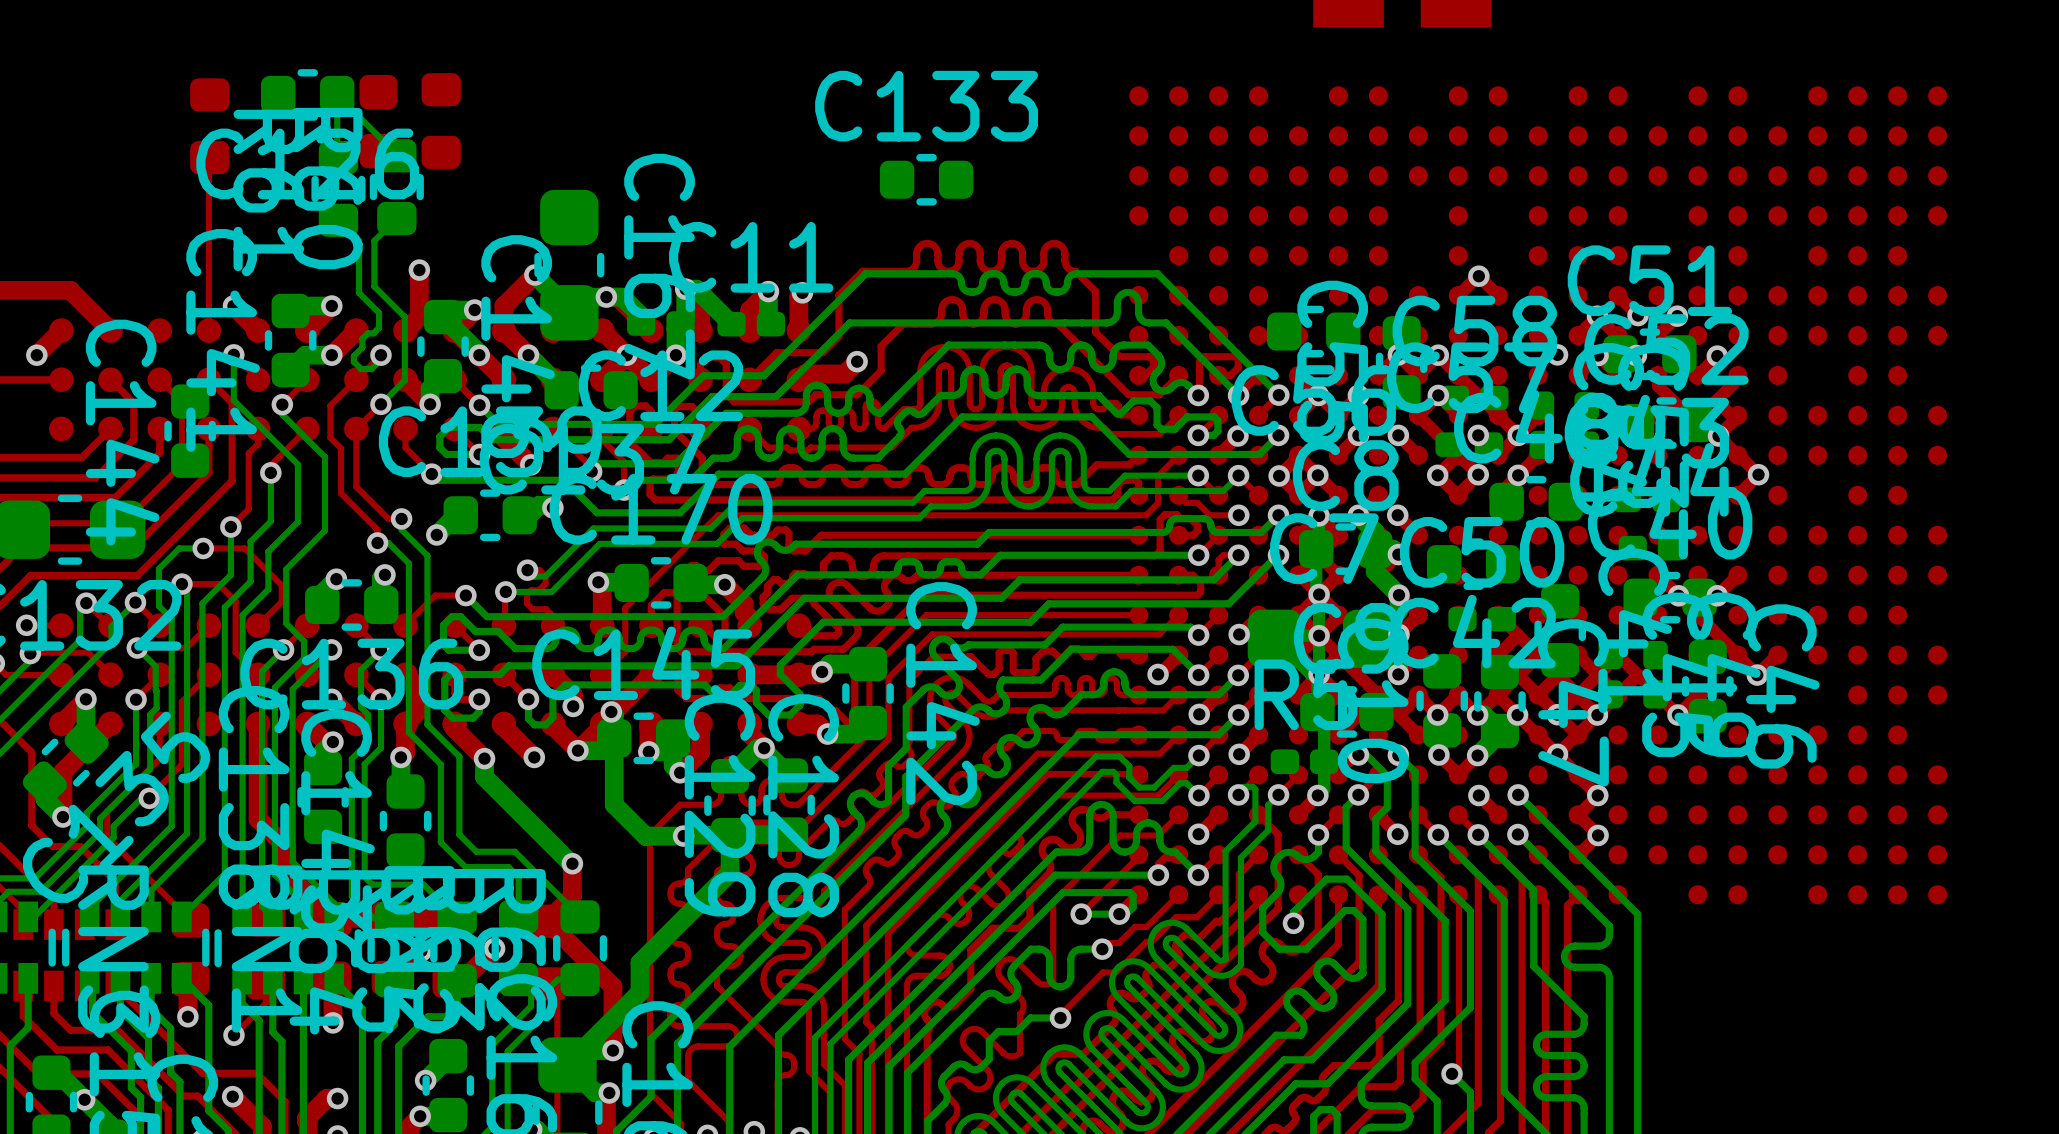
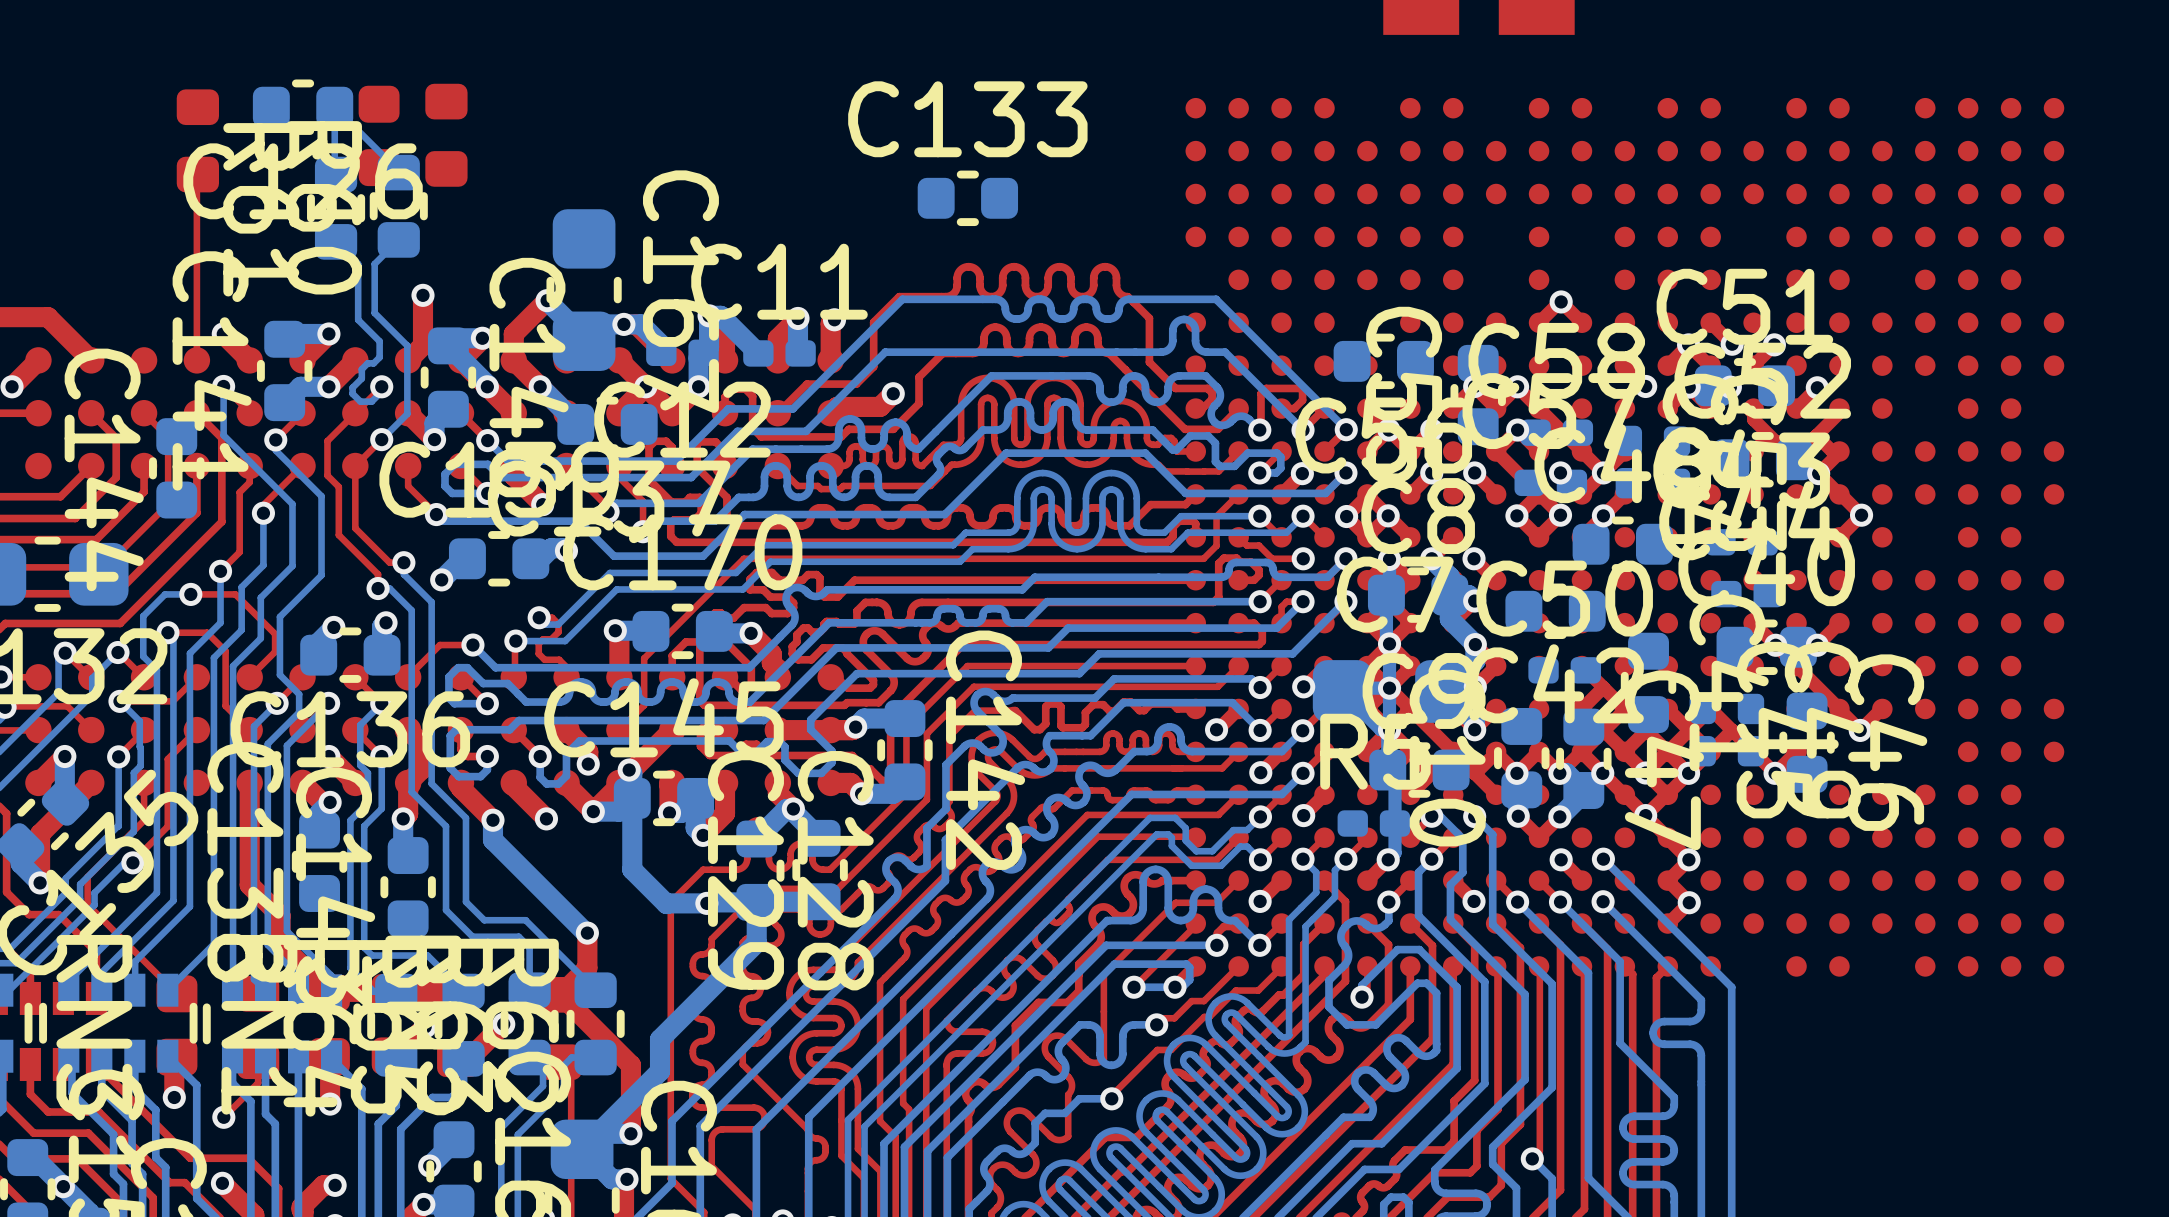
bottom track: (1238, 794) (1238, 791) (1243, 786) (1252, 786) (1255, 789) (1255, 821) (1250, 826) -> (1303, 859) (1316, 872) (1316, 892)

